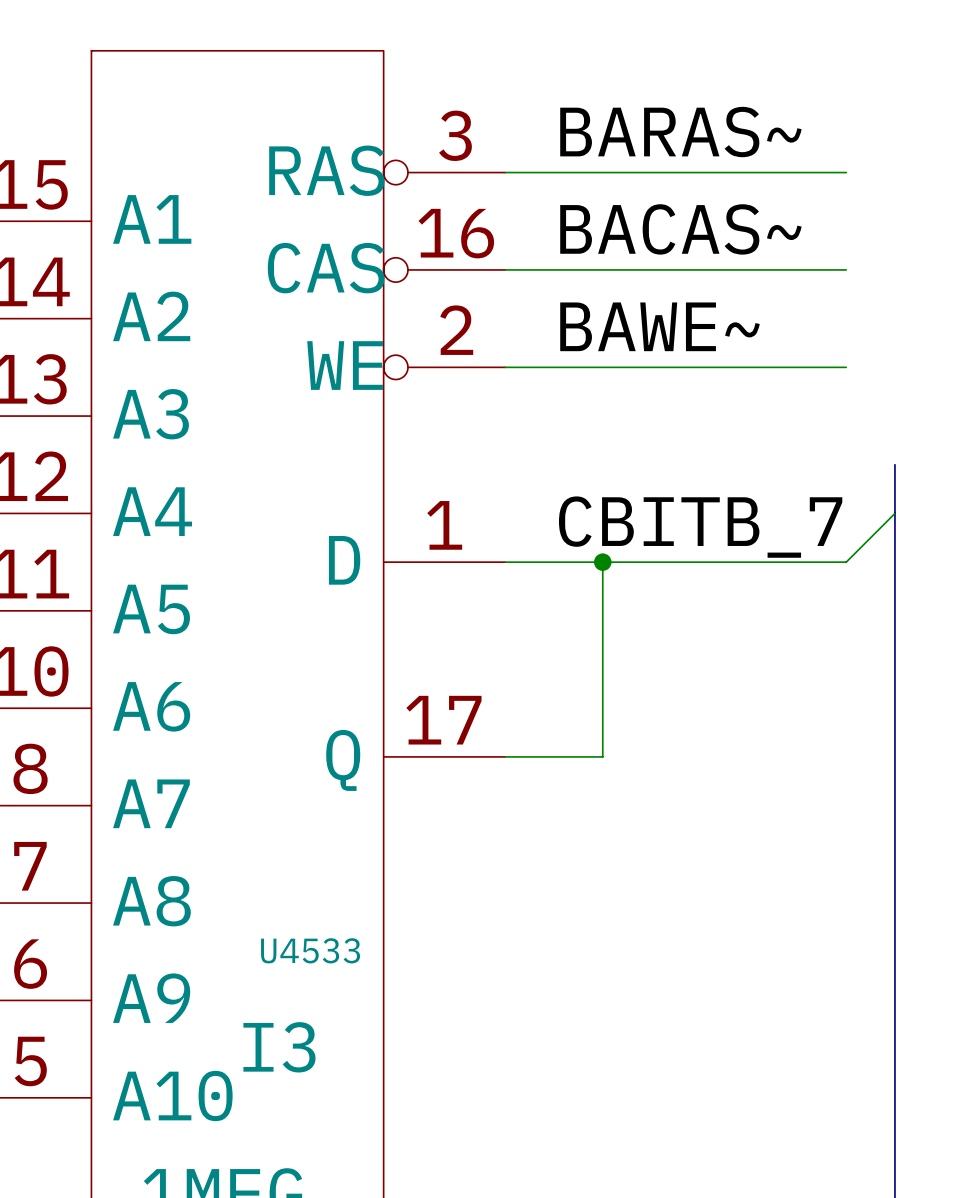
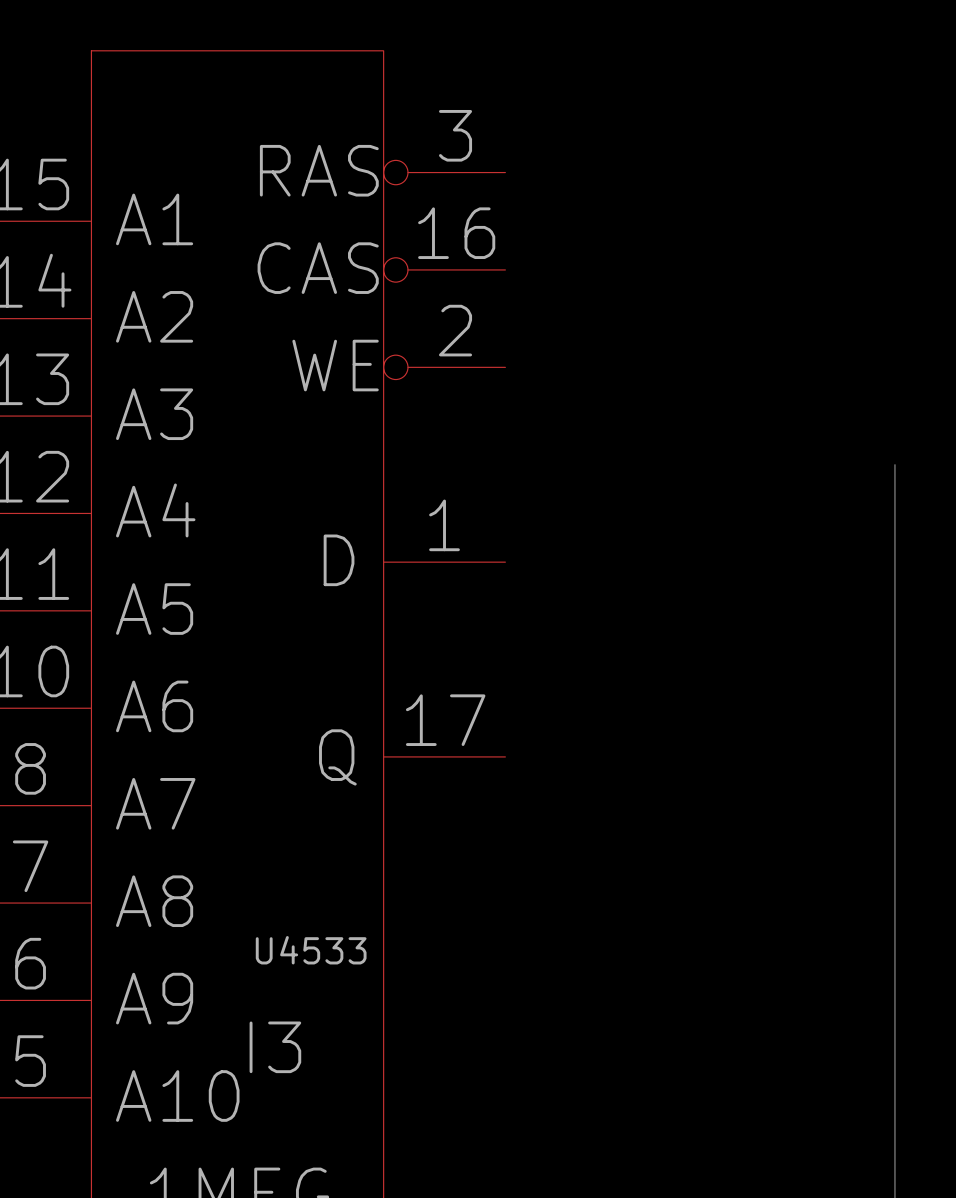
label: BARAS~ (680, 132) -> none
wire: (505, 172) (846, 172) -> none
label: BACAS~ (680, 229) -> none
wire: (505, 269) (846, 269) -> none
label: BAWE~ (659, 326) -> none
wire: (505, 367) (846, 367) -> none
wire: (894, 513) (846, 562) (505, 562) -> none
label: CBITB_7 (700, 527) -> none
wire: (602, 562) (602, 756) (505, 756) -> none
junction: (602, 562) -> none

